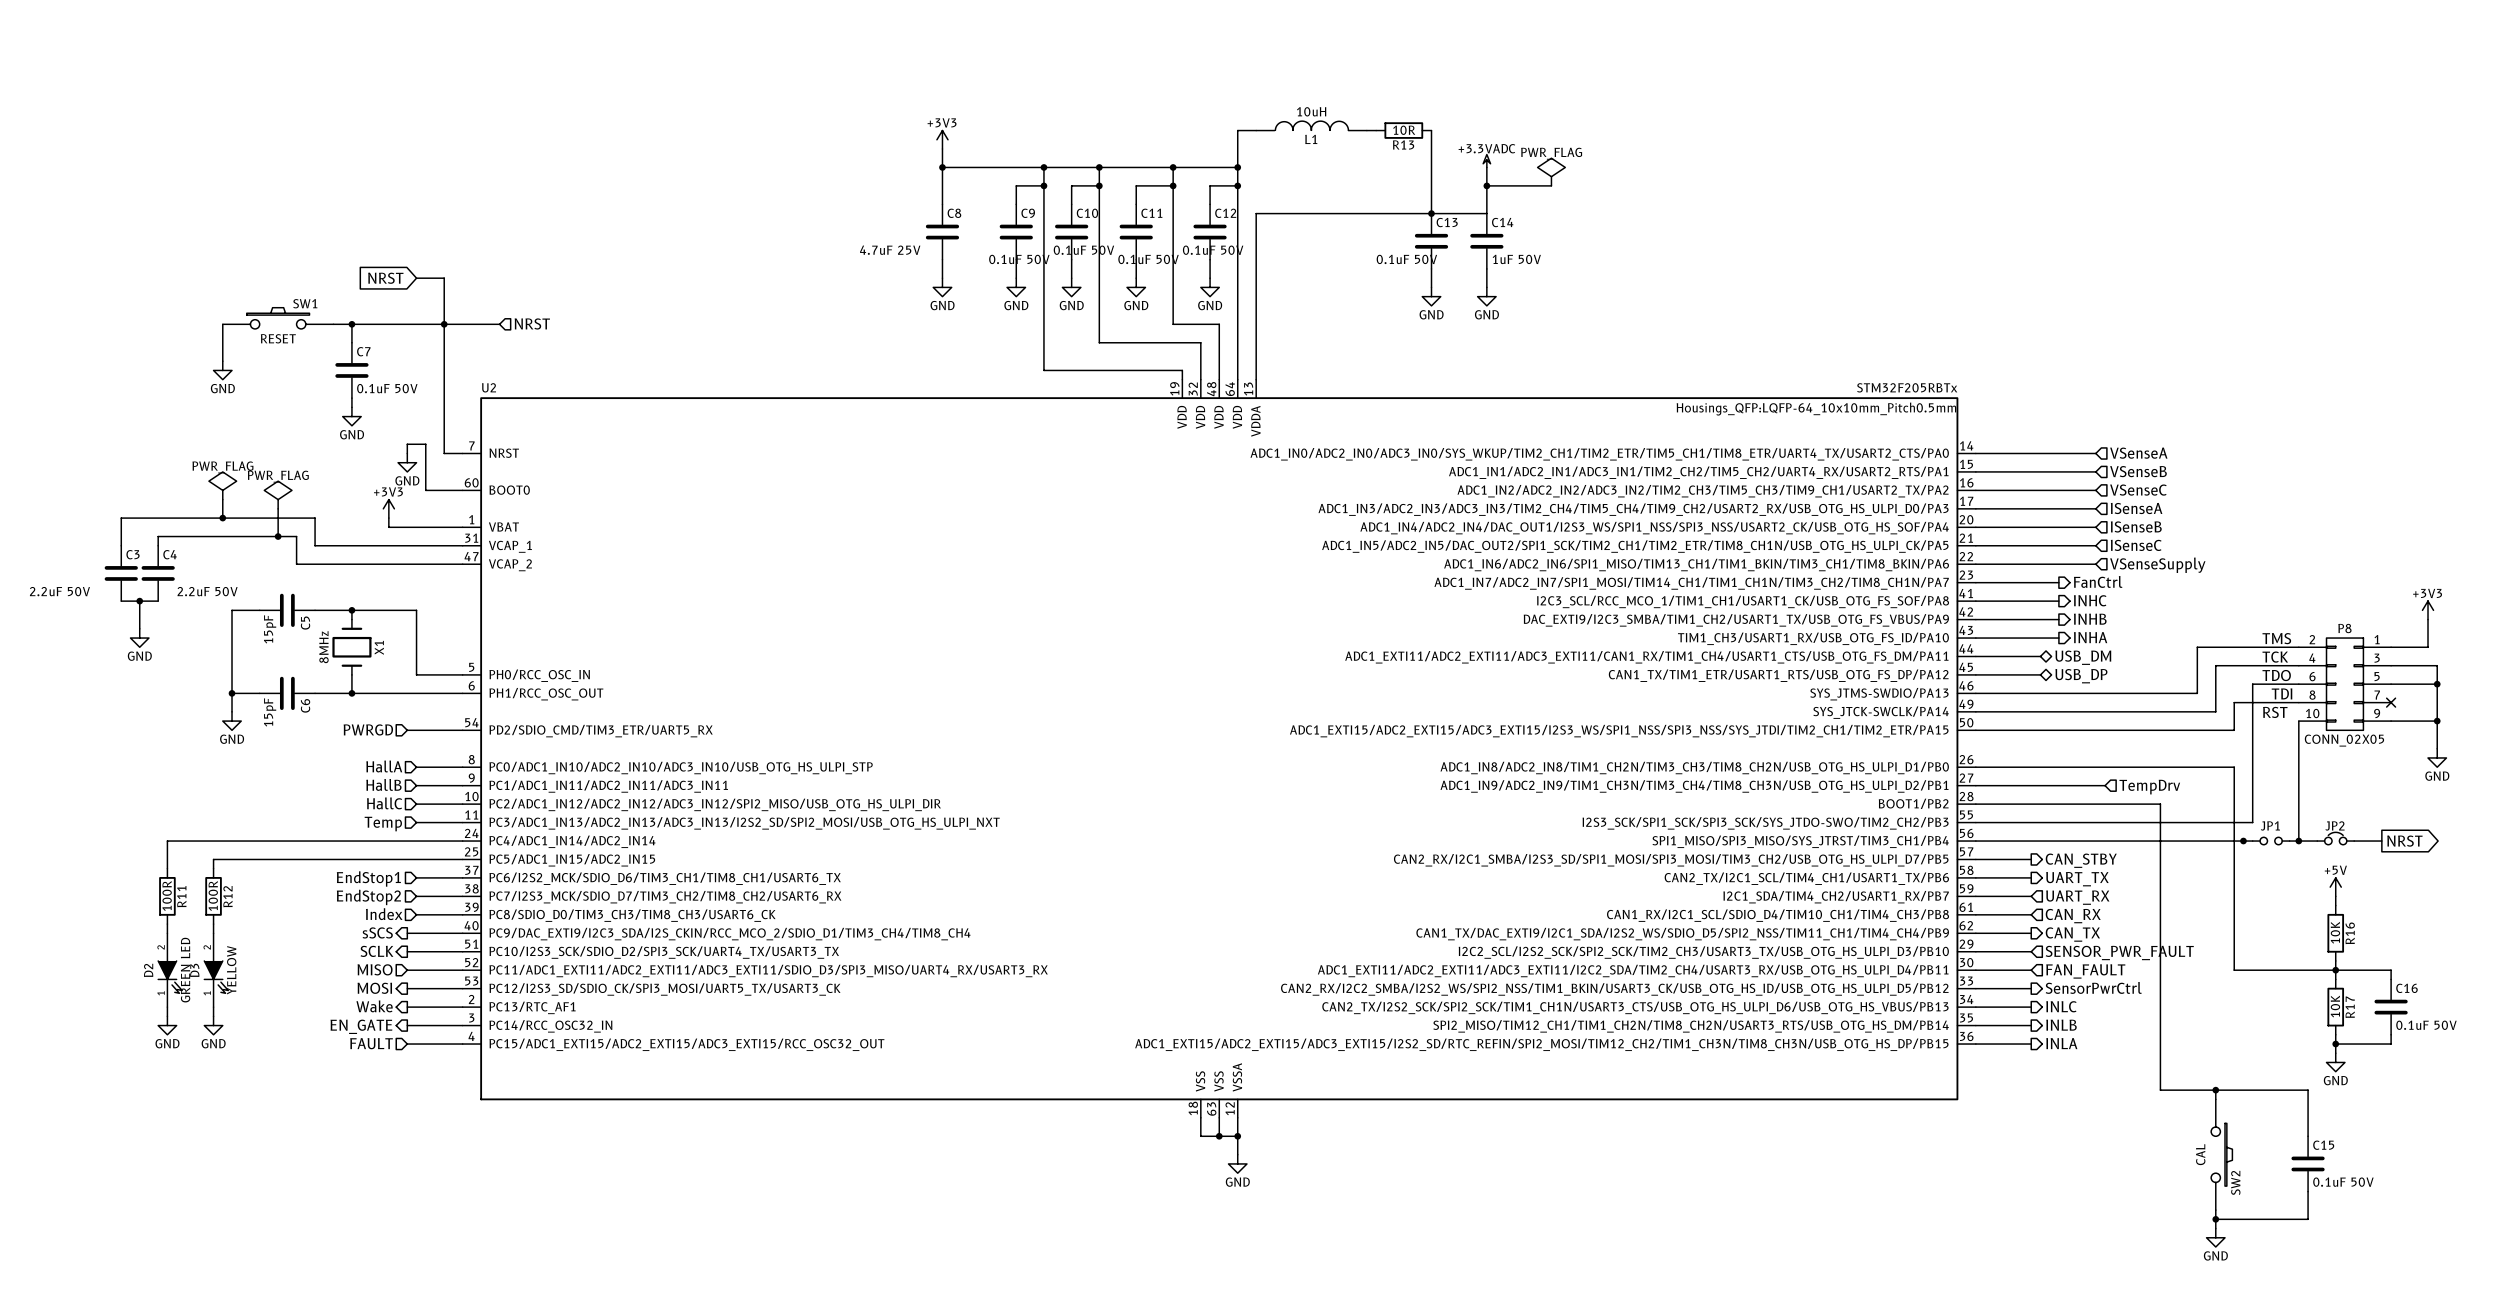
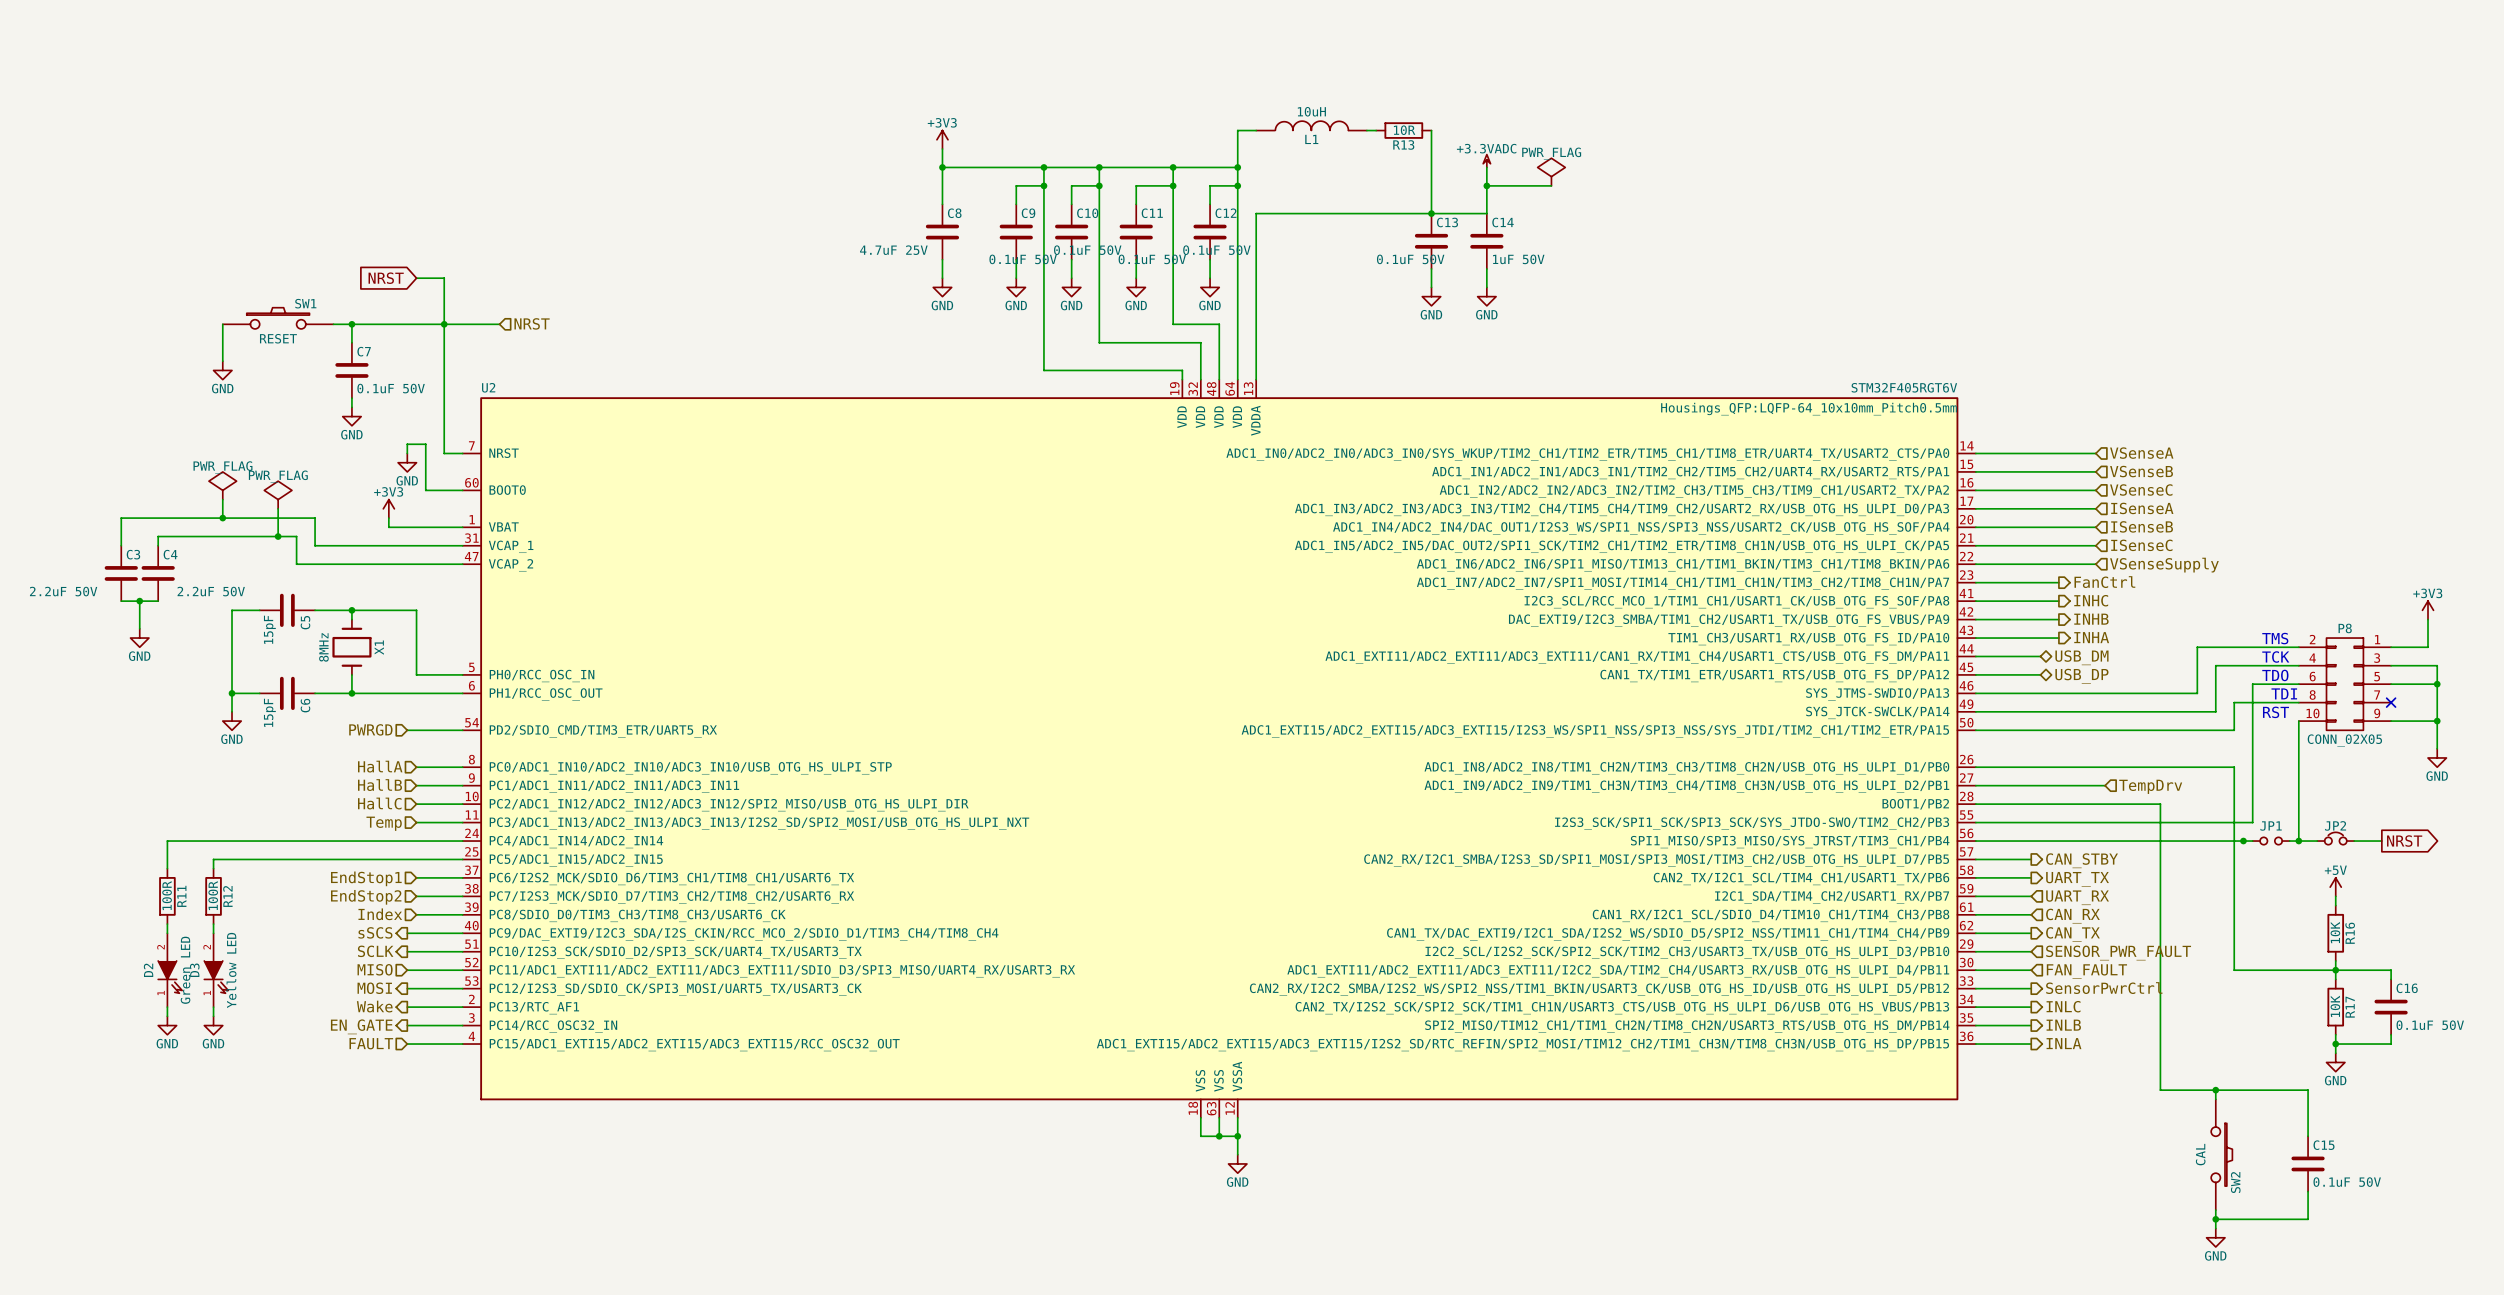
U2 value: STM32F205RBTx (1907, 387) -> STM32F405RGT6V (1904, 387)
D2 value: GREEN LED (185, 970) -> Green LED (185, 970)
D3 value: YELLOW (231, 970) -> Yellow LED (231, 970)

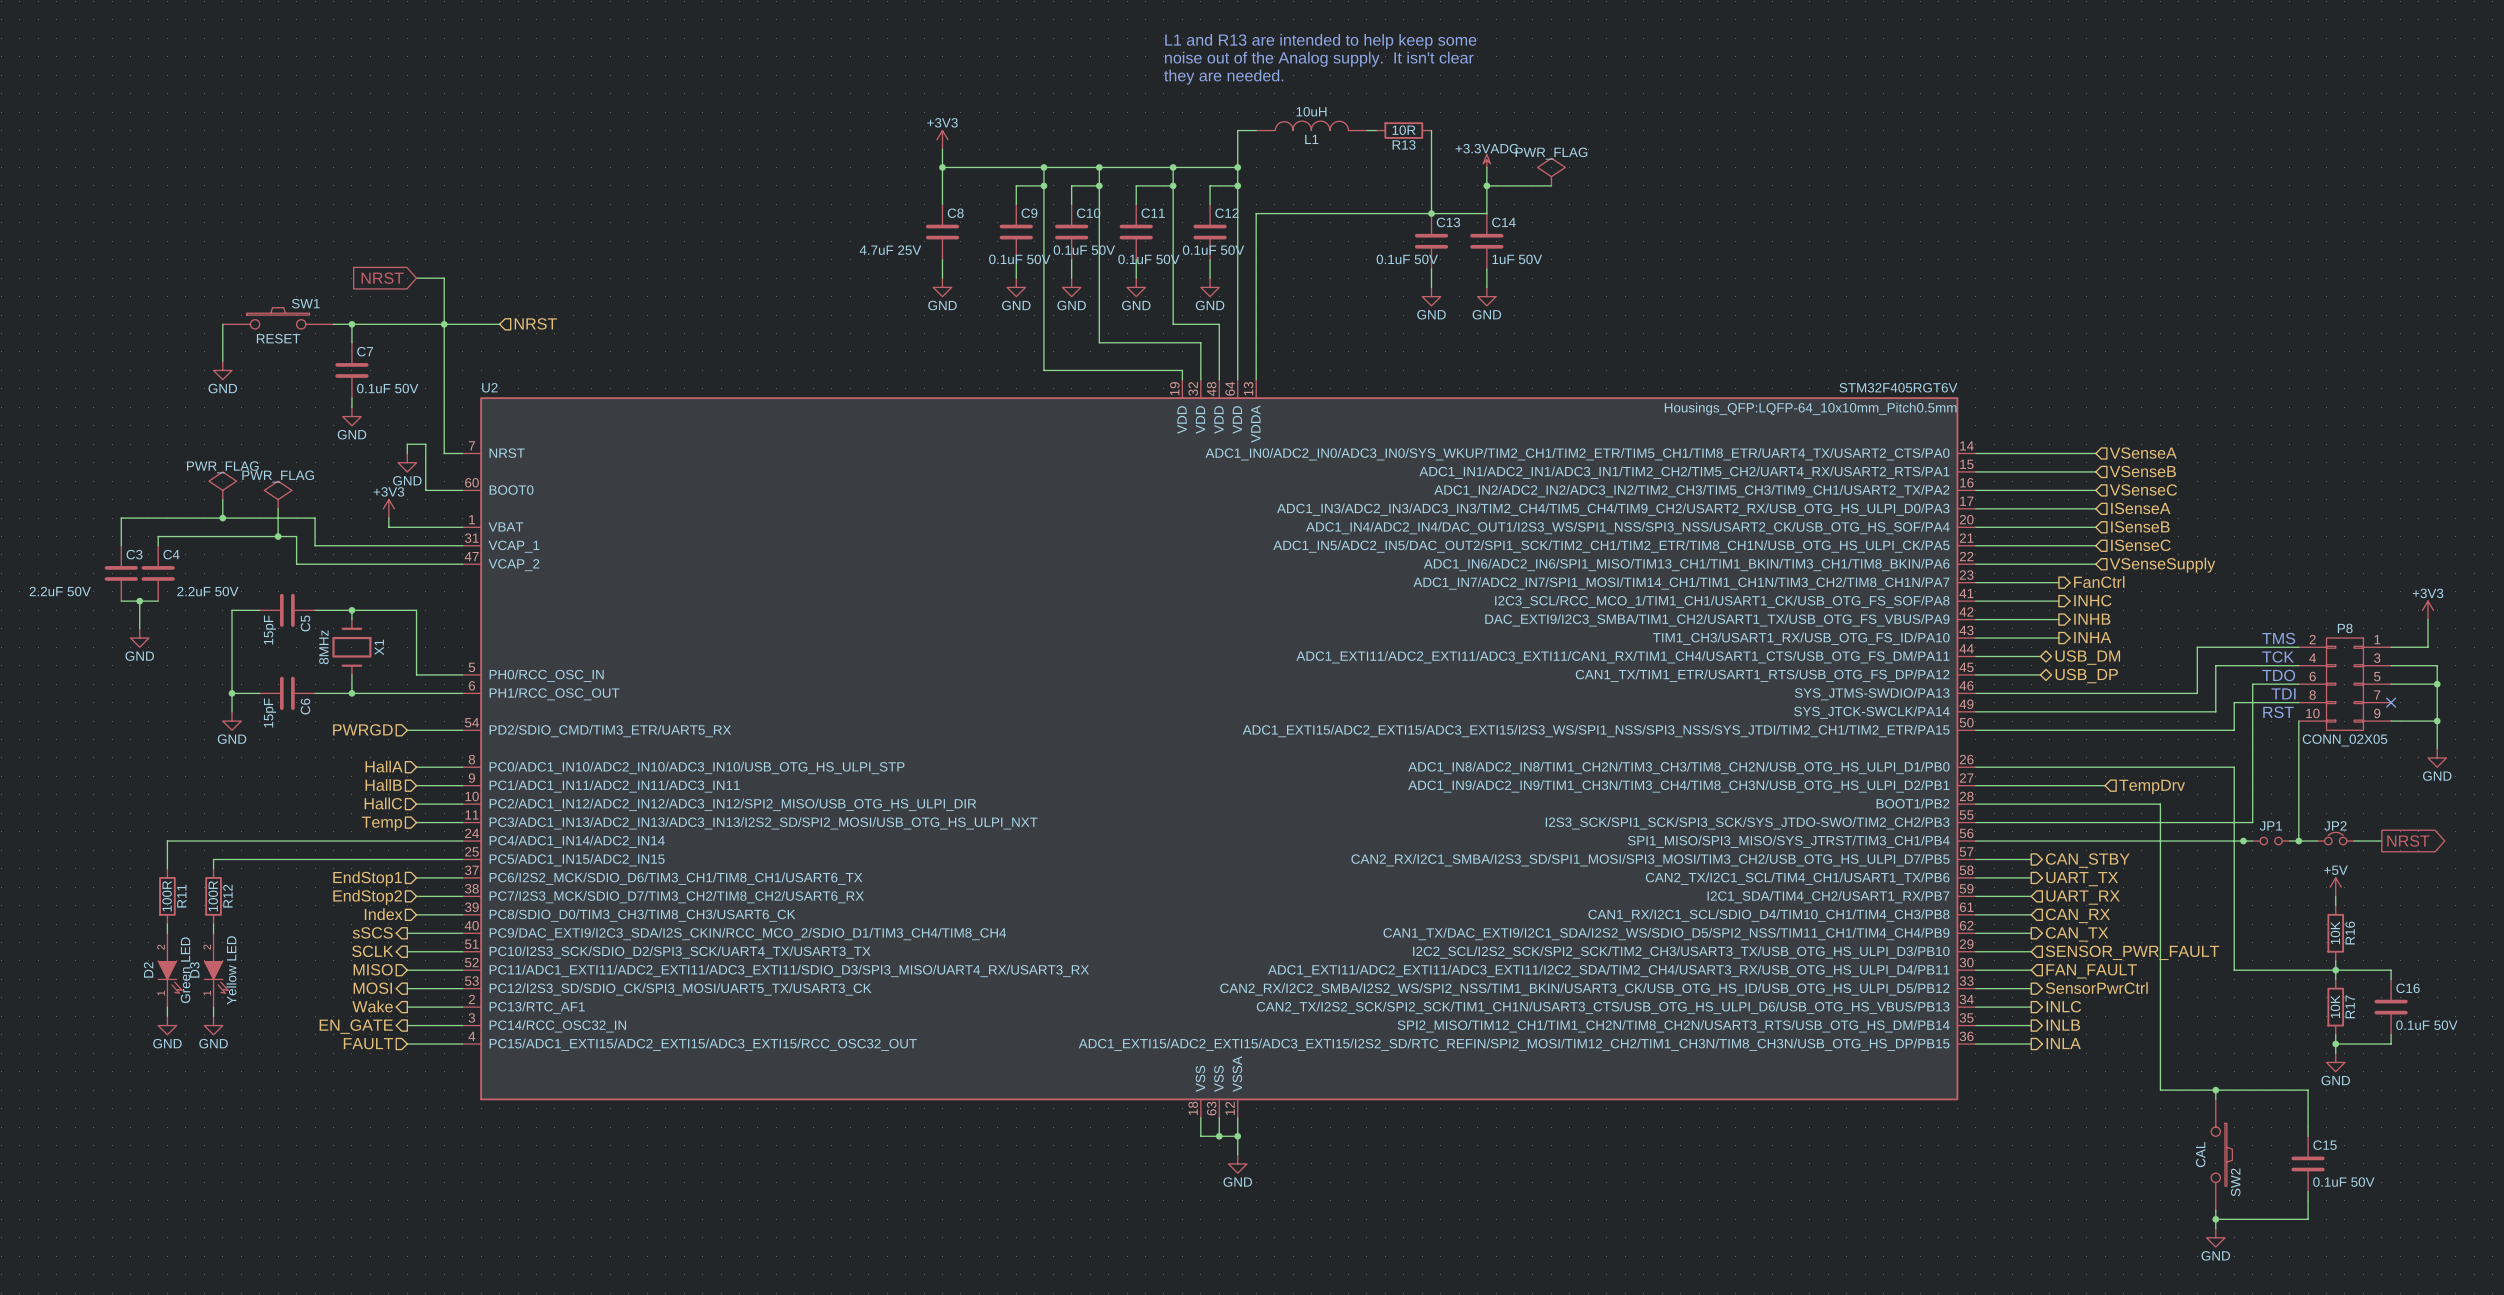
text: none -> L1 and R13 are intended to help keep some (1320, 41)
text: none -> noise out of the Analog supply. It isn't clear (1319, 59)
text: none -> they are needed. (1223, 77)

